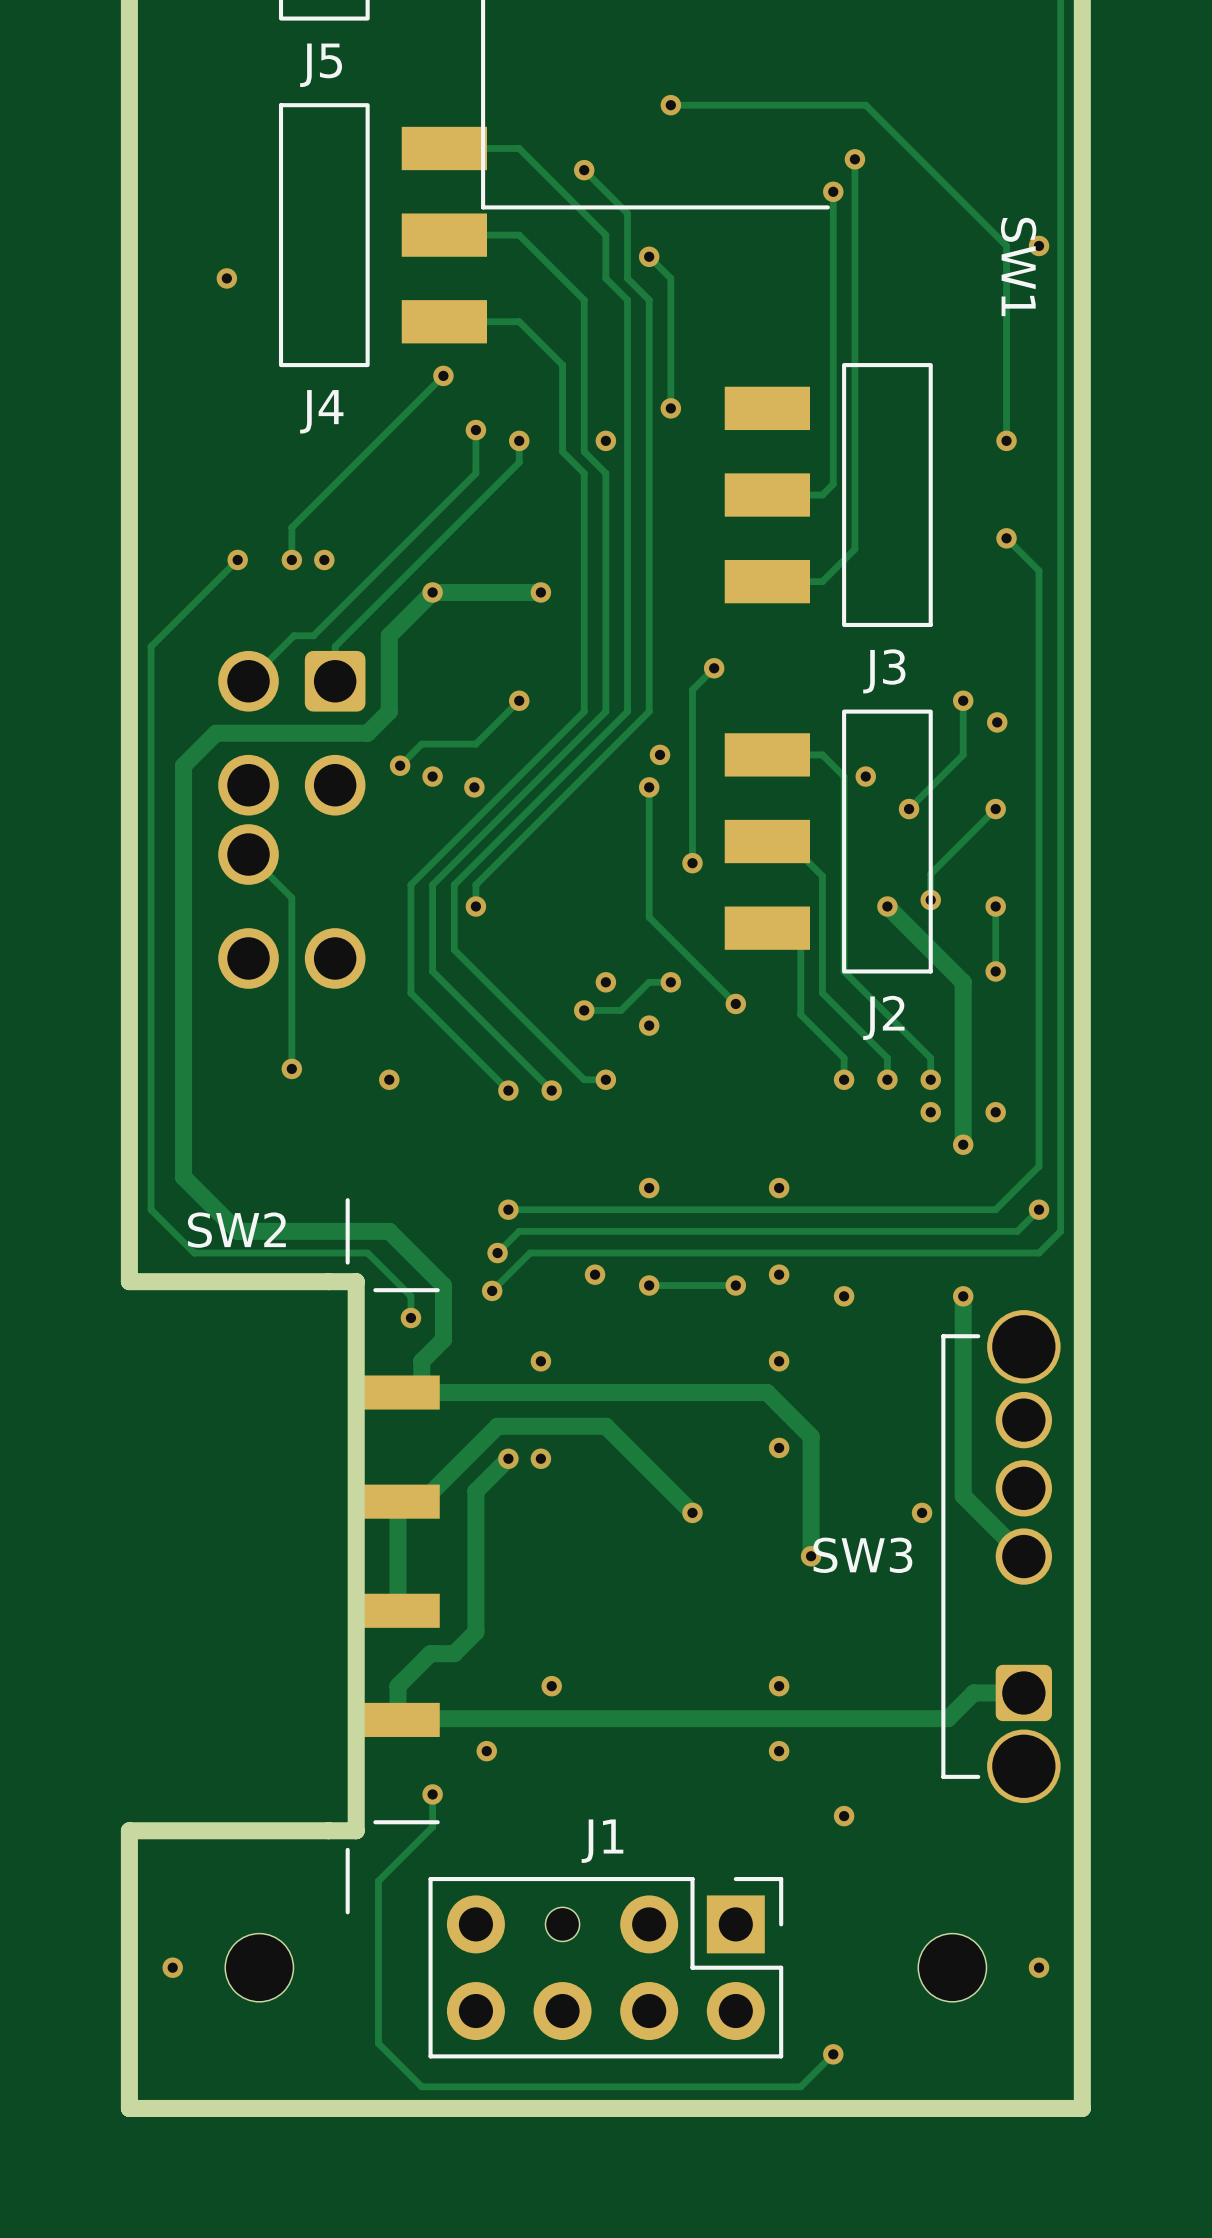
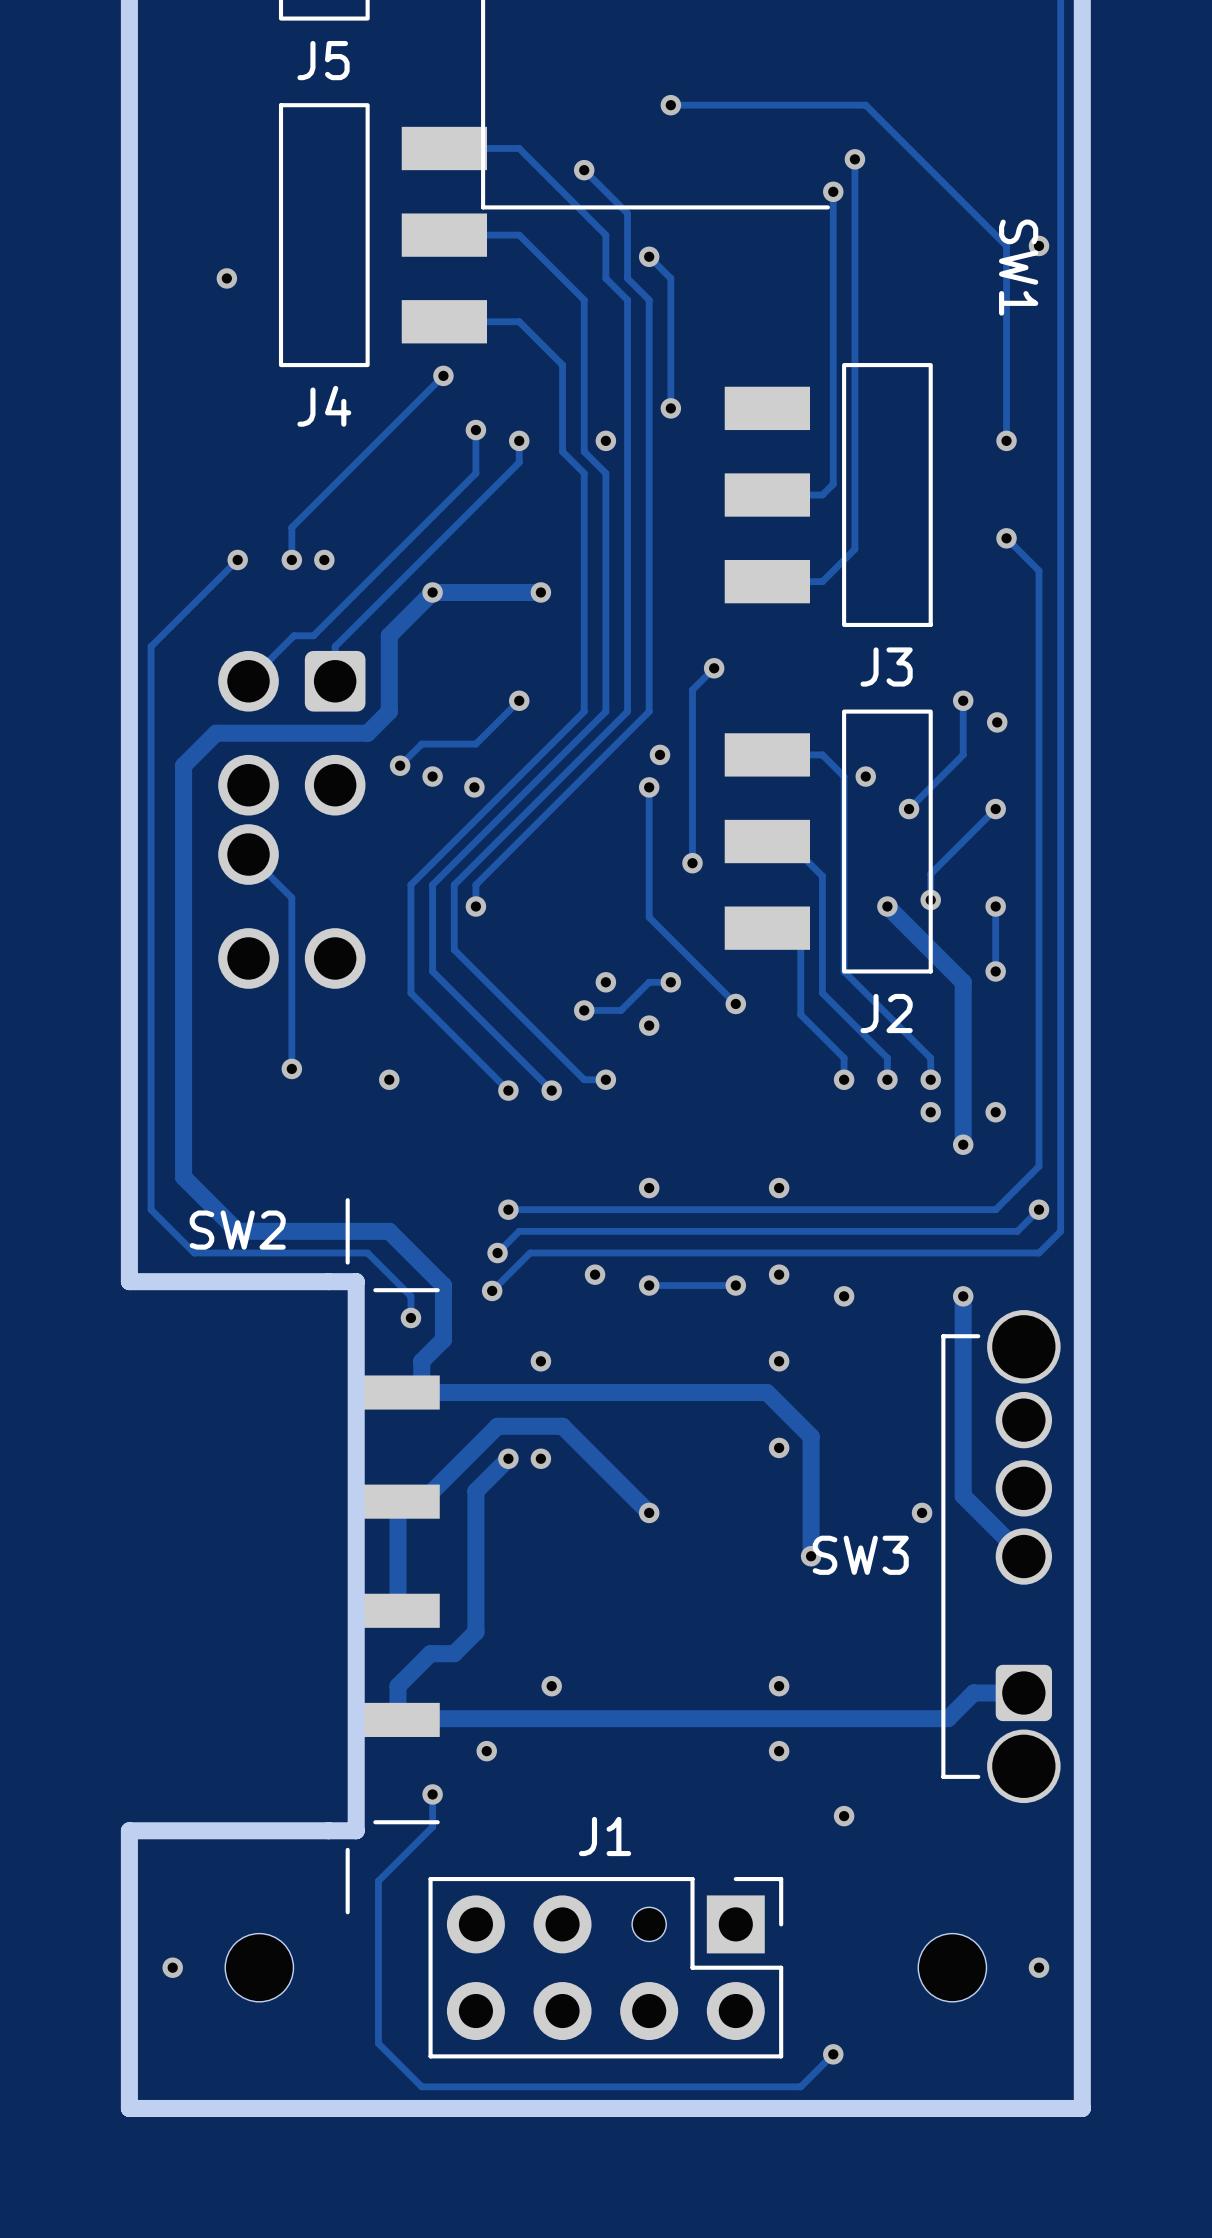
track: (562, 1426) (605, 1426) (692, 1512) -> (562, 1426) (649, 1512)
via position: (692, 1512) -> (649, 1512)
J1 footprint: [428, 1876, 784, 2059] -> [428, 1876, 784, 2059]

